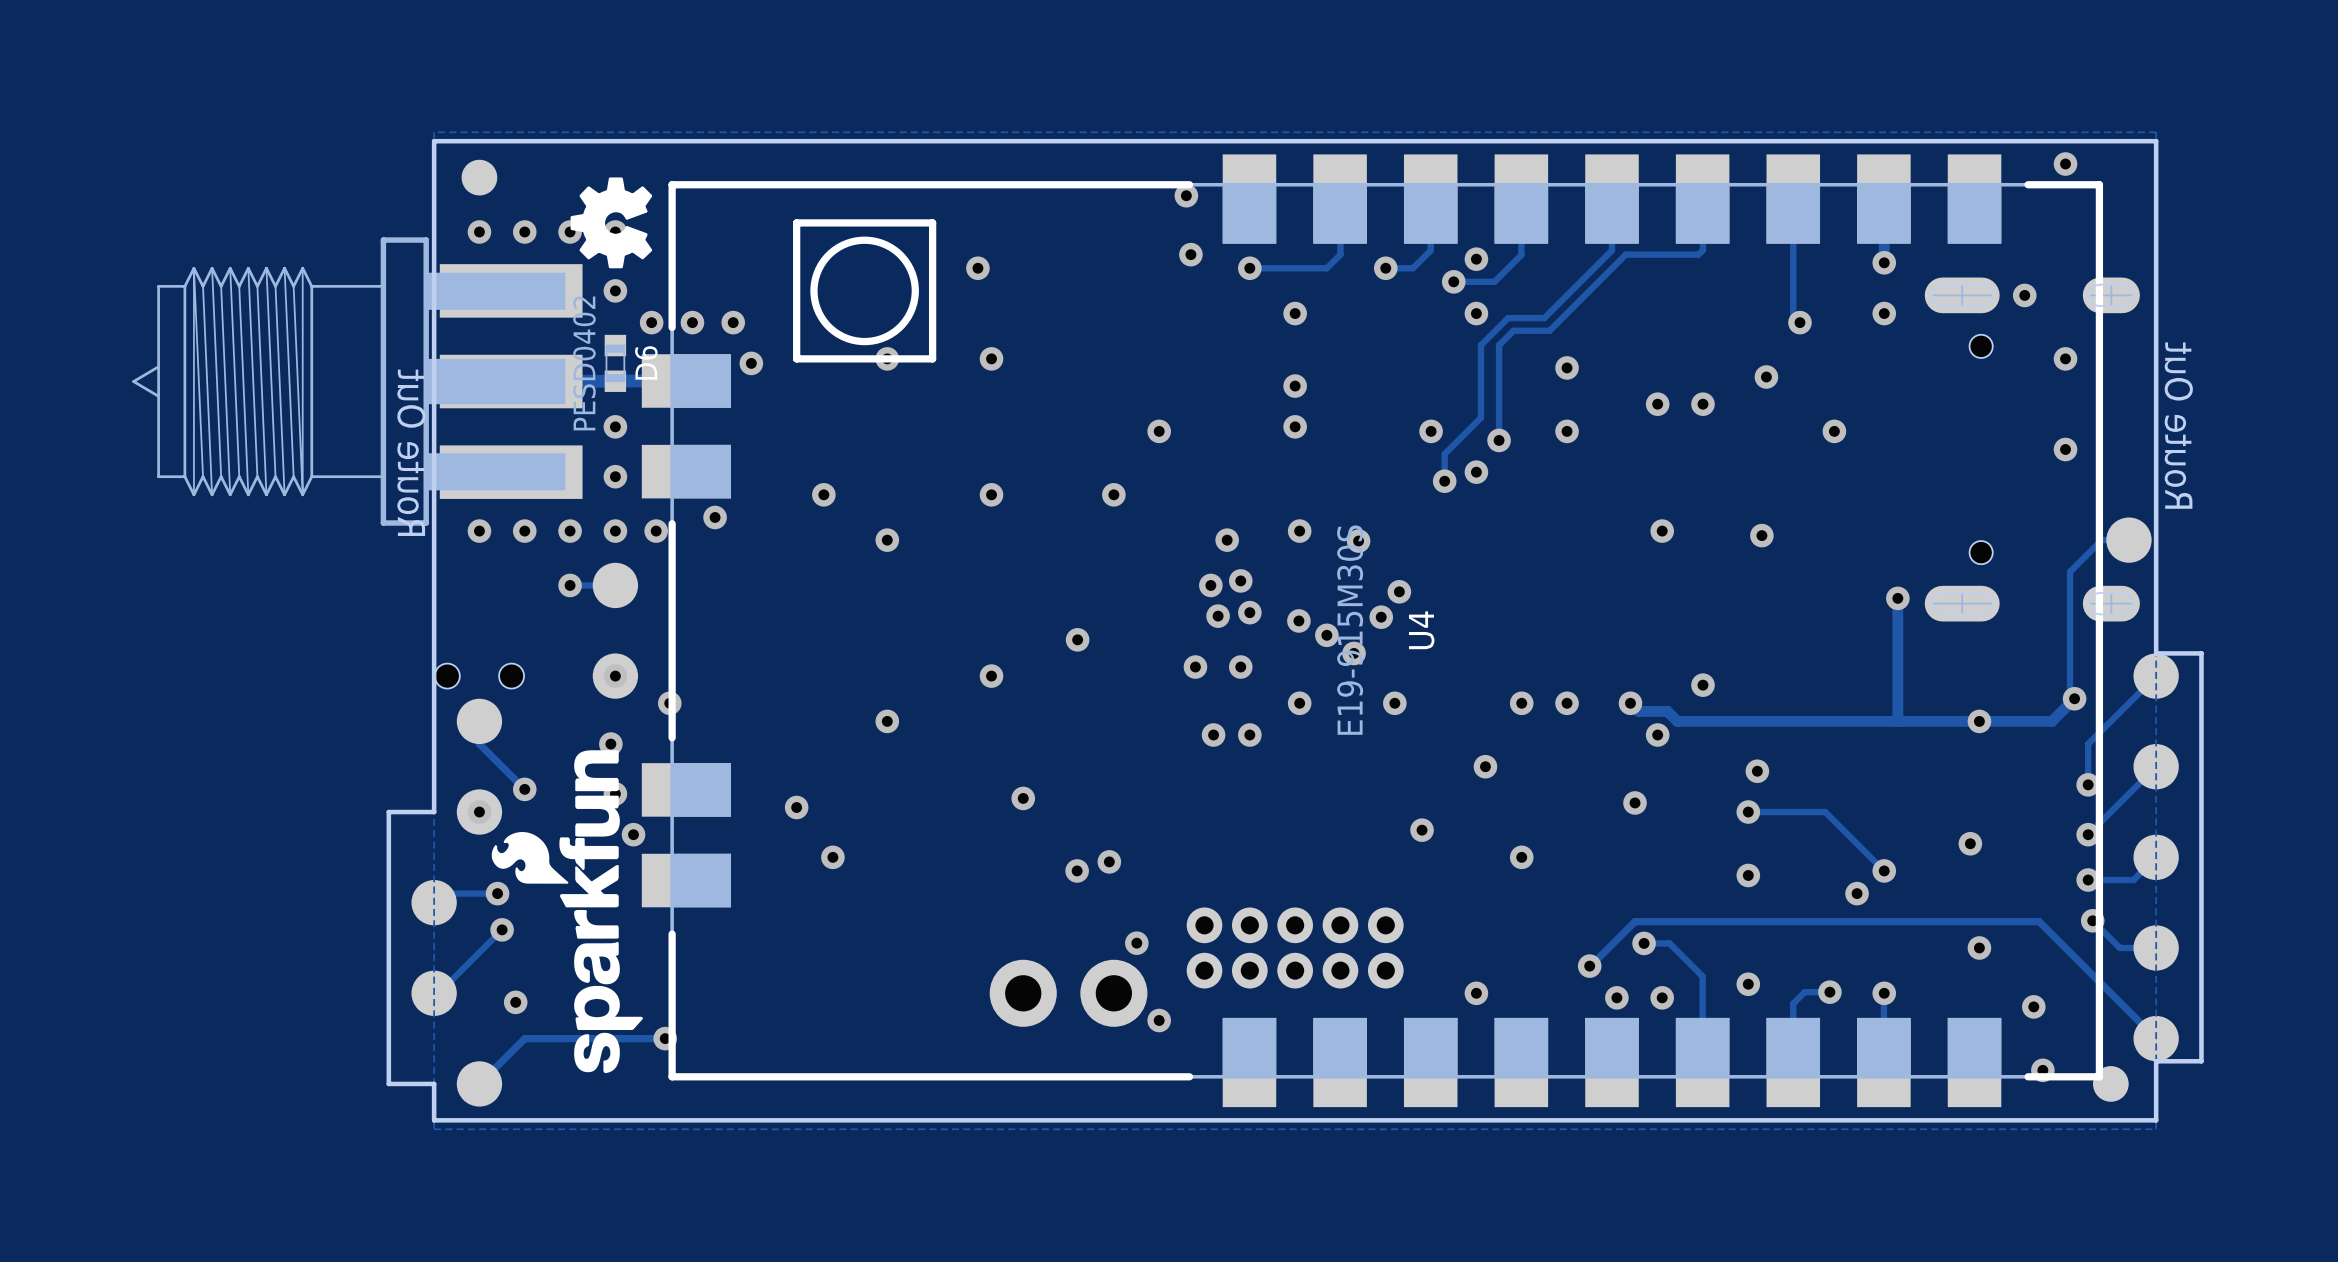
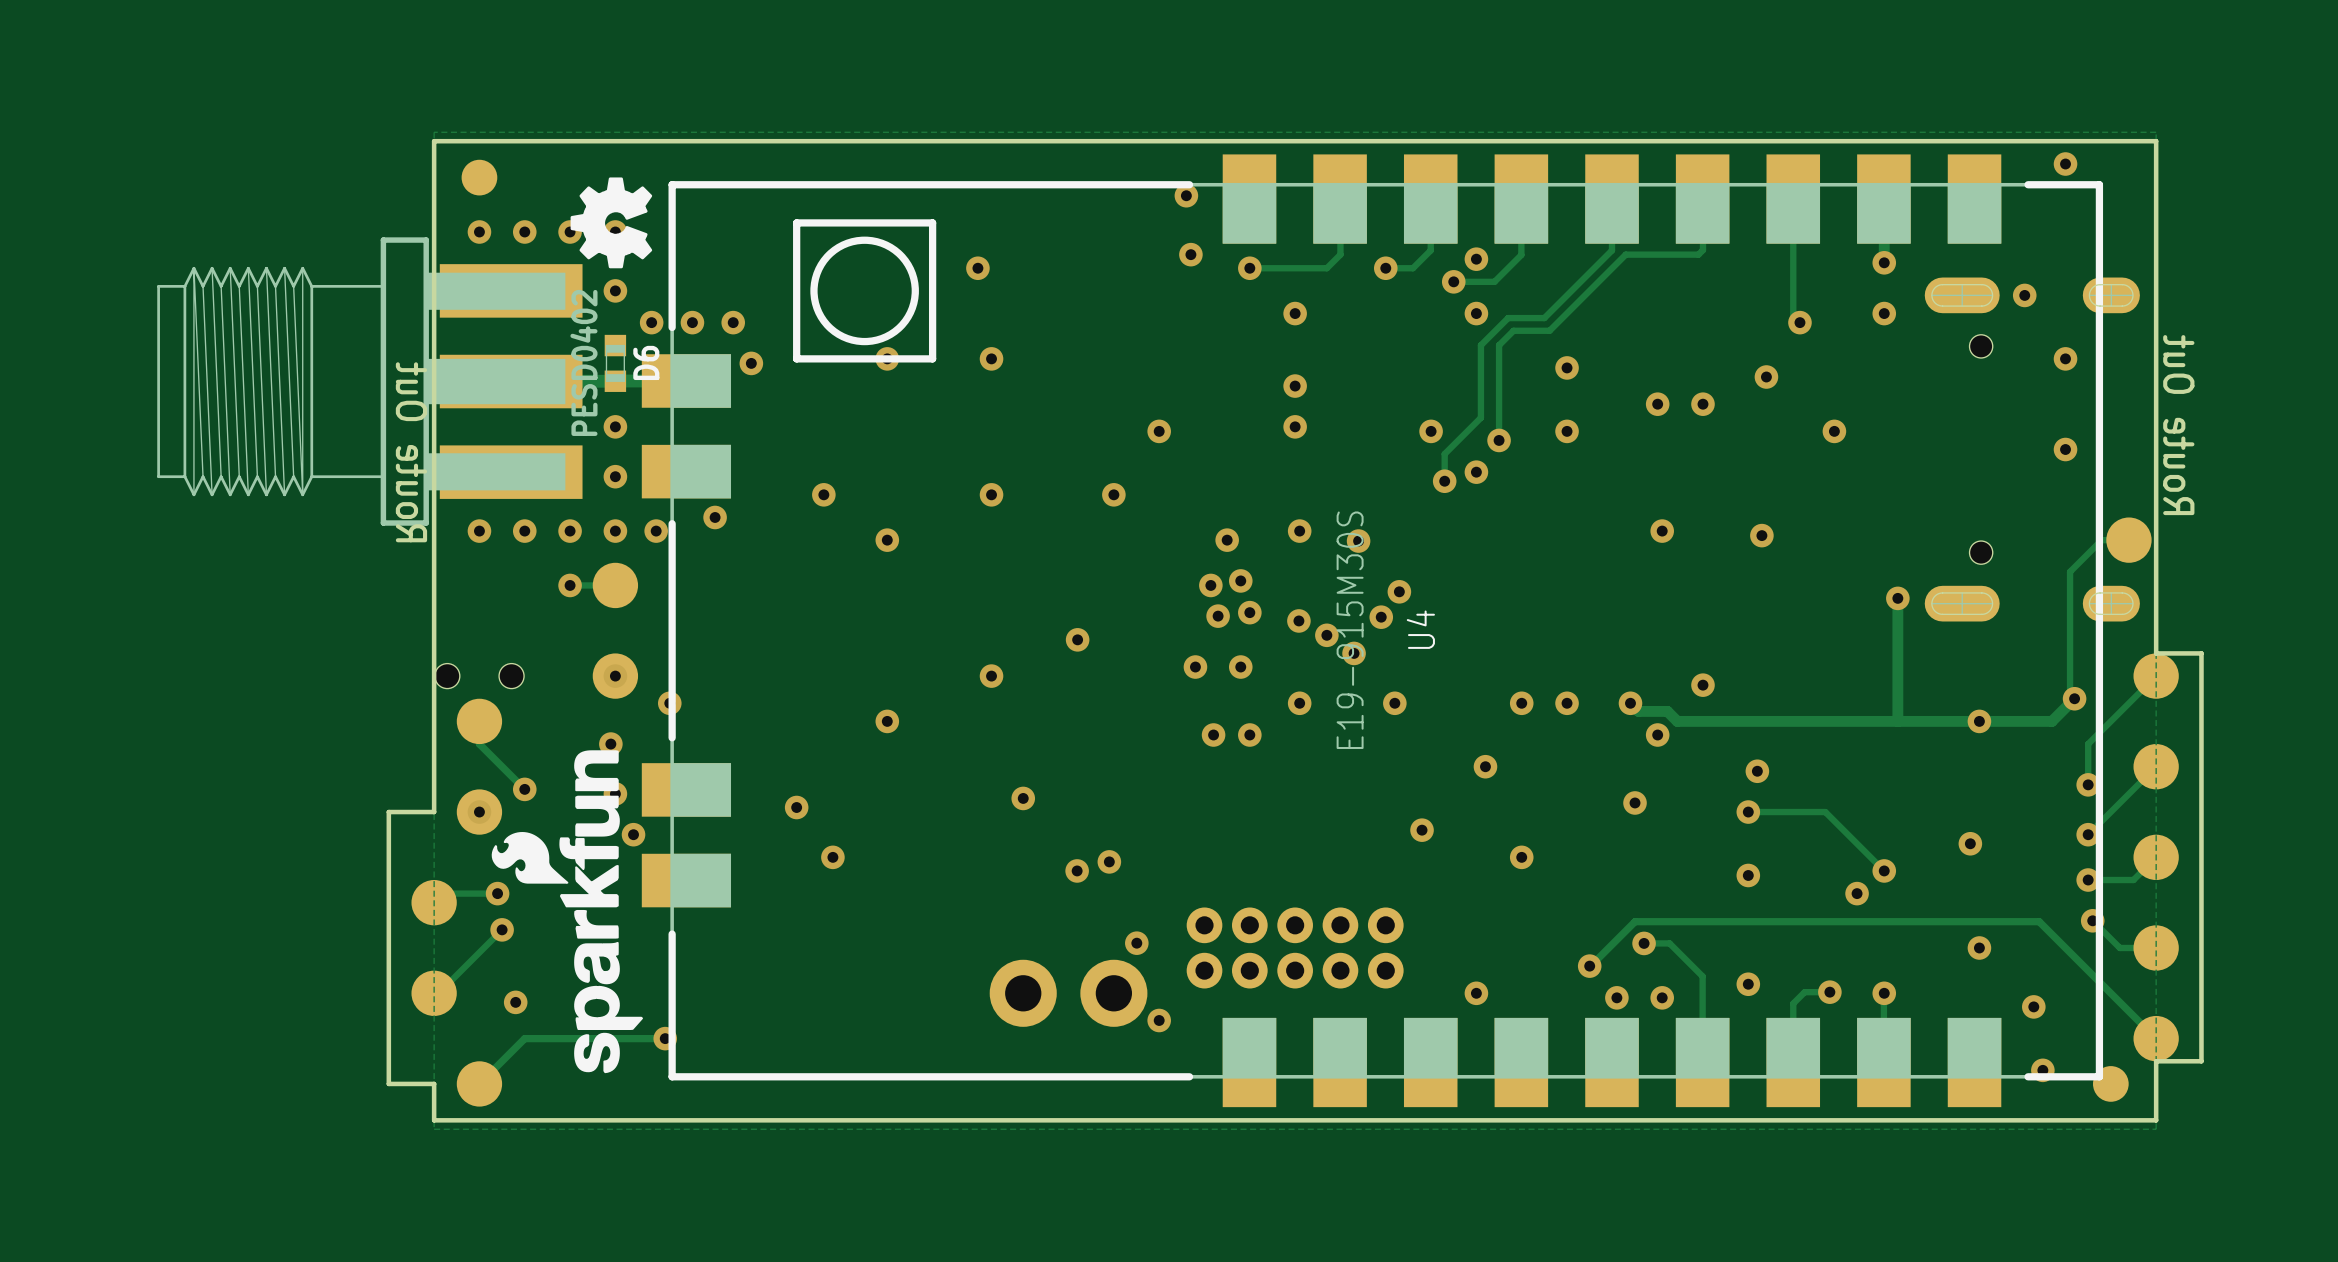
part footprint: [132, 237, 583, 526] -> [157, 237, 583, 526]

